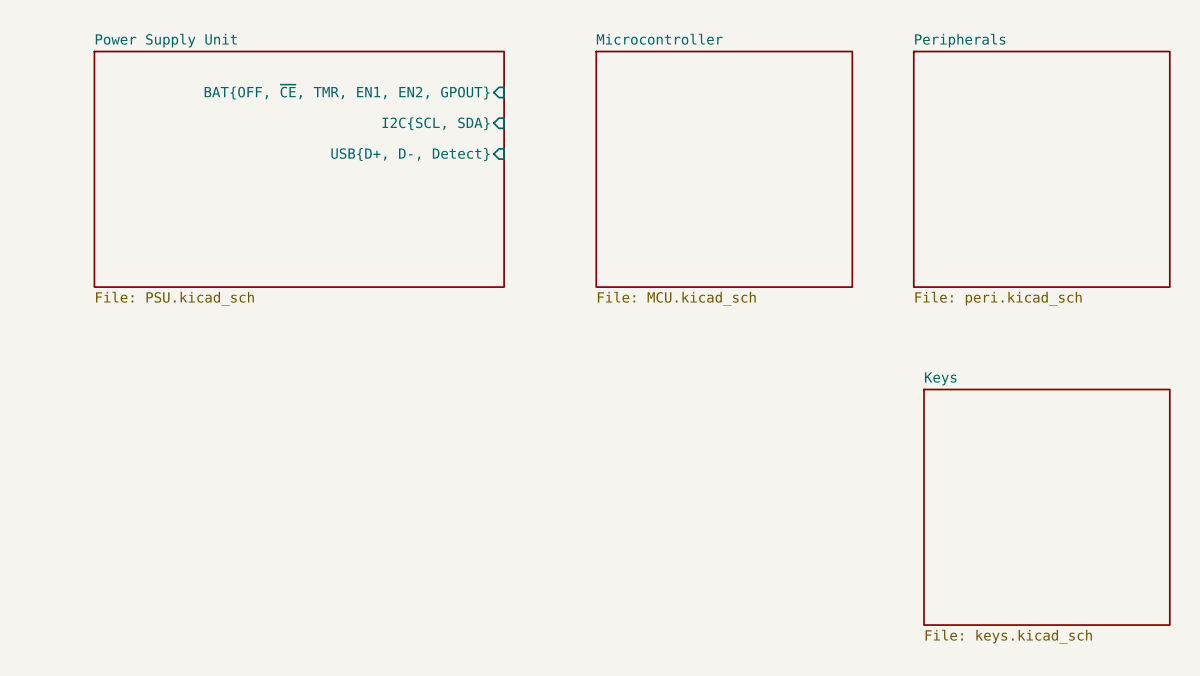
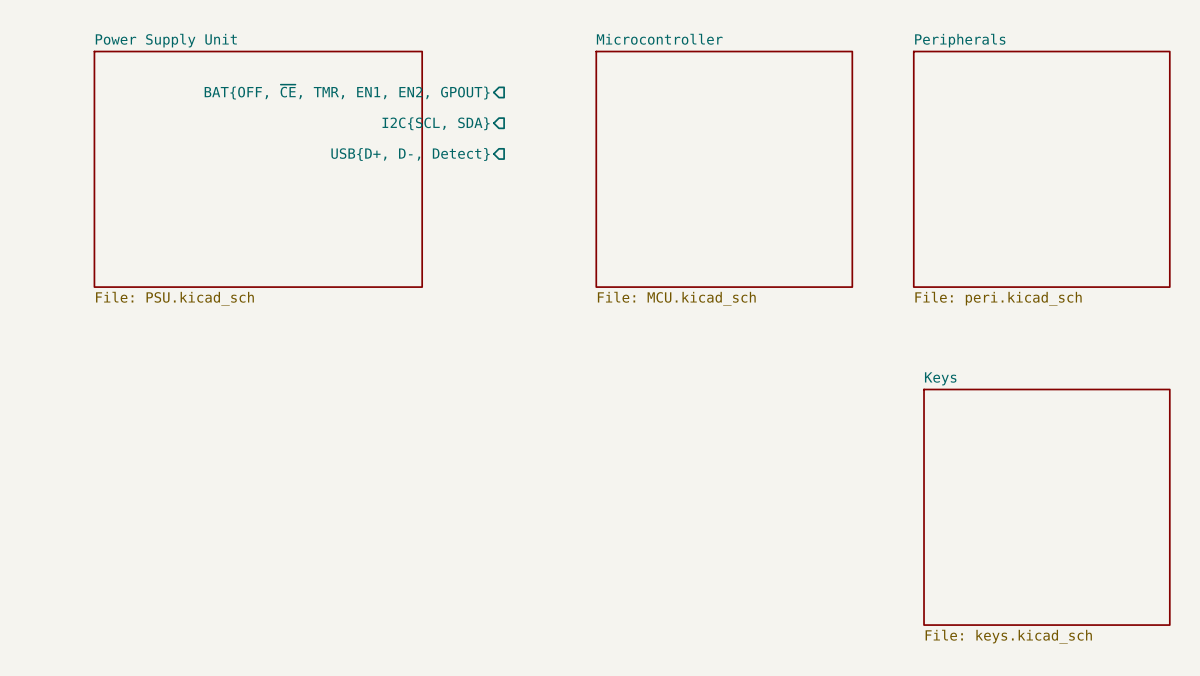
sheet Power Supply Unit: none -> File: PSU.kicad_sch (258, 169)
sheet Power Supply Unit: File: PSU.kicad_sch (299, 169) -> none

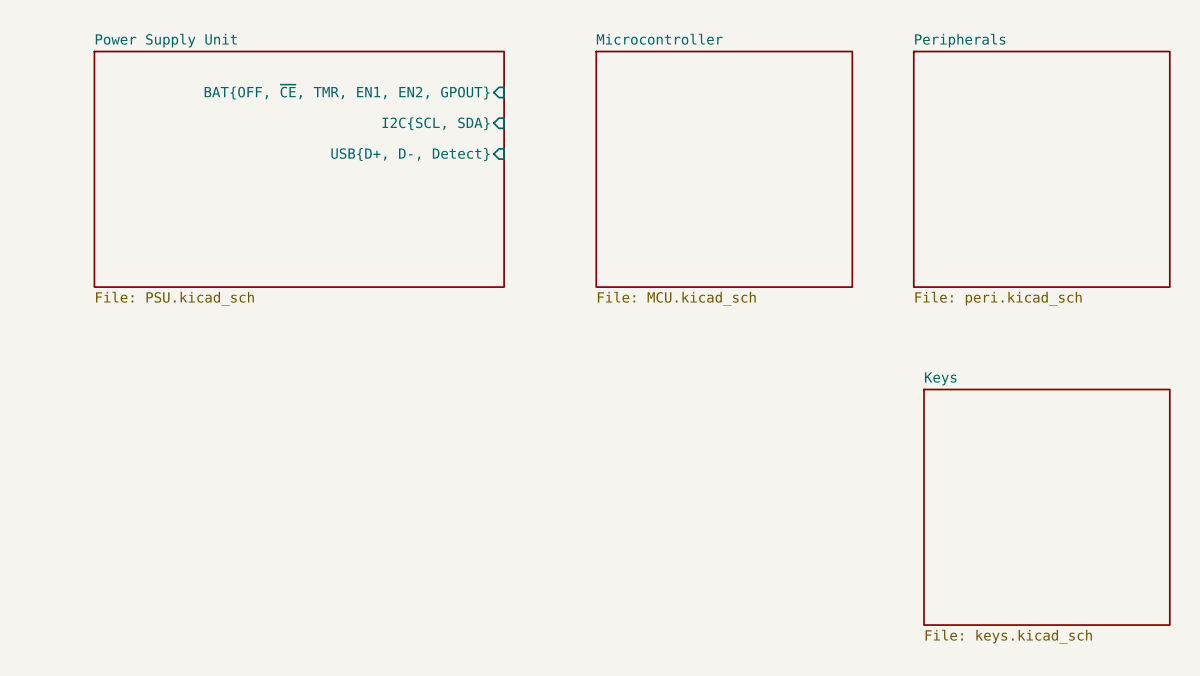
sheet Power Supply Unit: File: PSU.kicad_sch (258, 169) -> none
sheet Power Supply Unit: none -> File: PSU.kicad_sch (299, 169)

